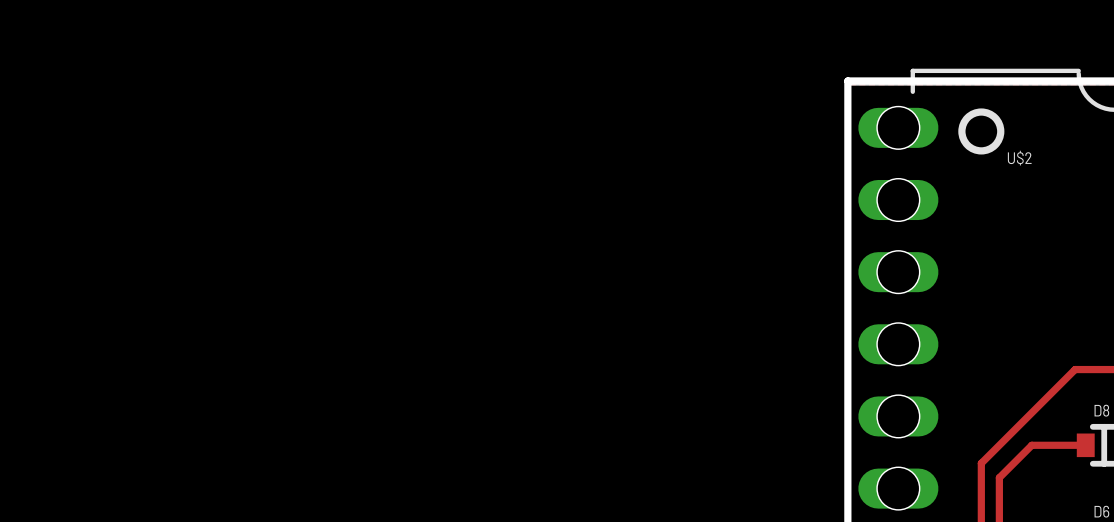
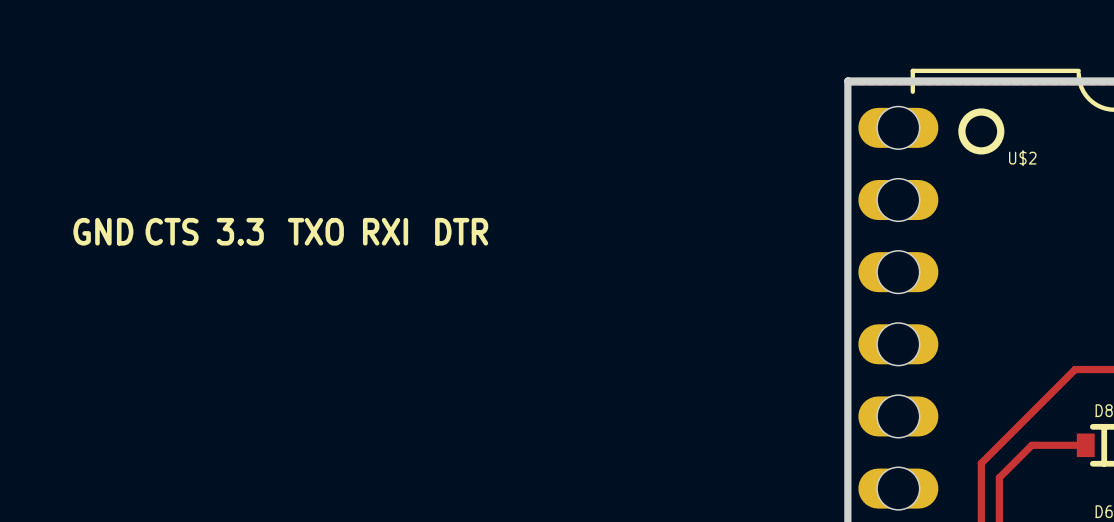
text: none -> GND (103, 231)
text: none -> CTS (172, 231)
text: none -> 3.3 (240, 231)
text: none -> TXO (315, 231)
text: none -> RXI (385, 231)
text: none -> DTR (461, 231)

